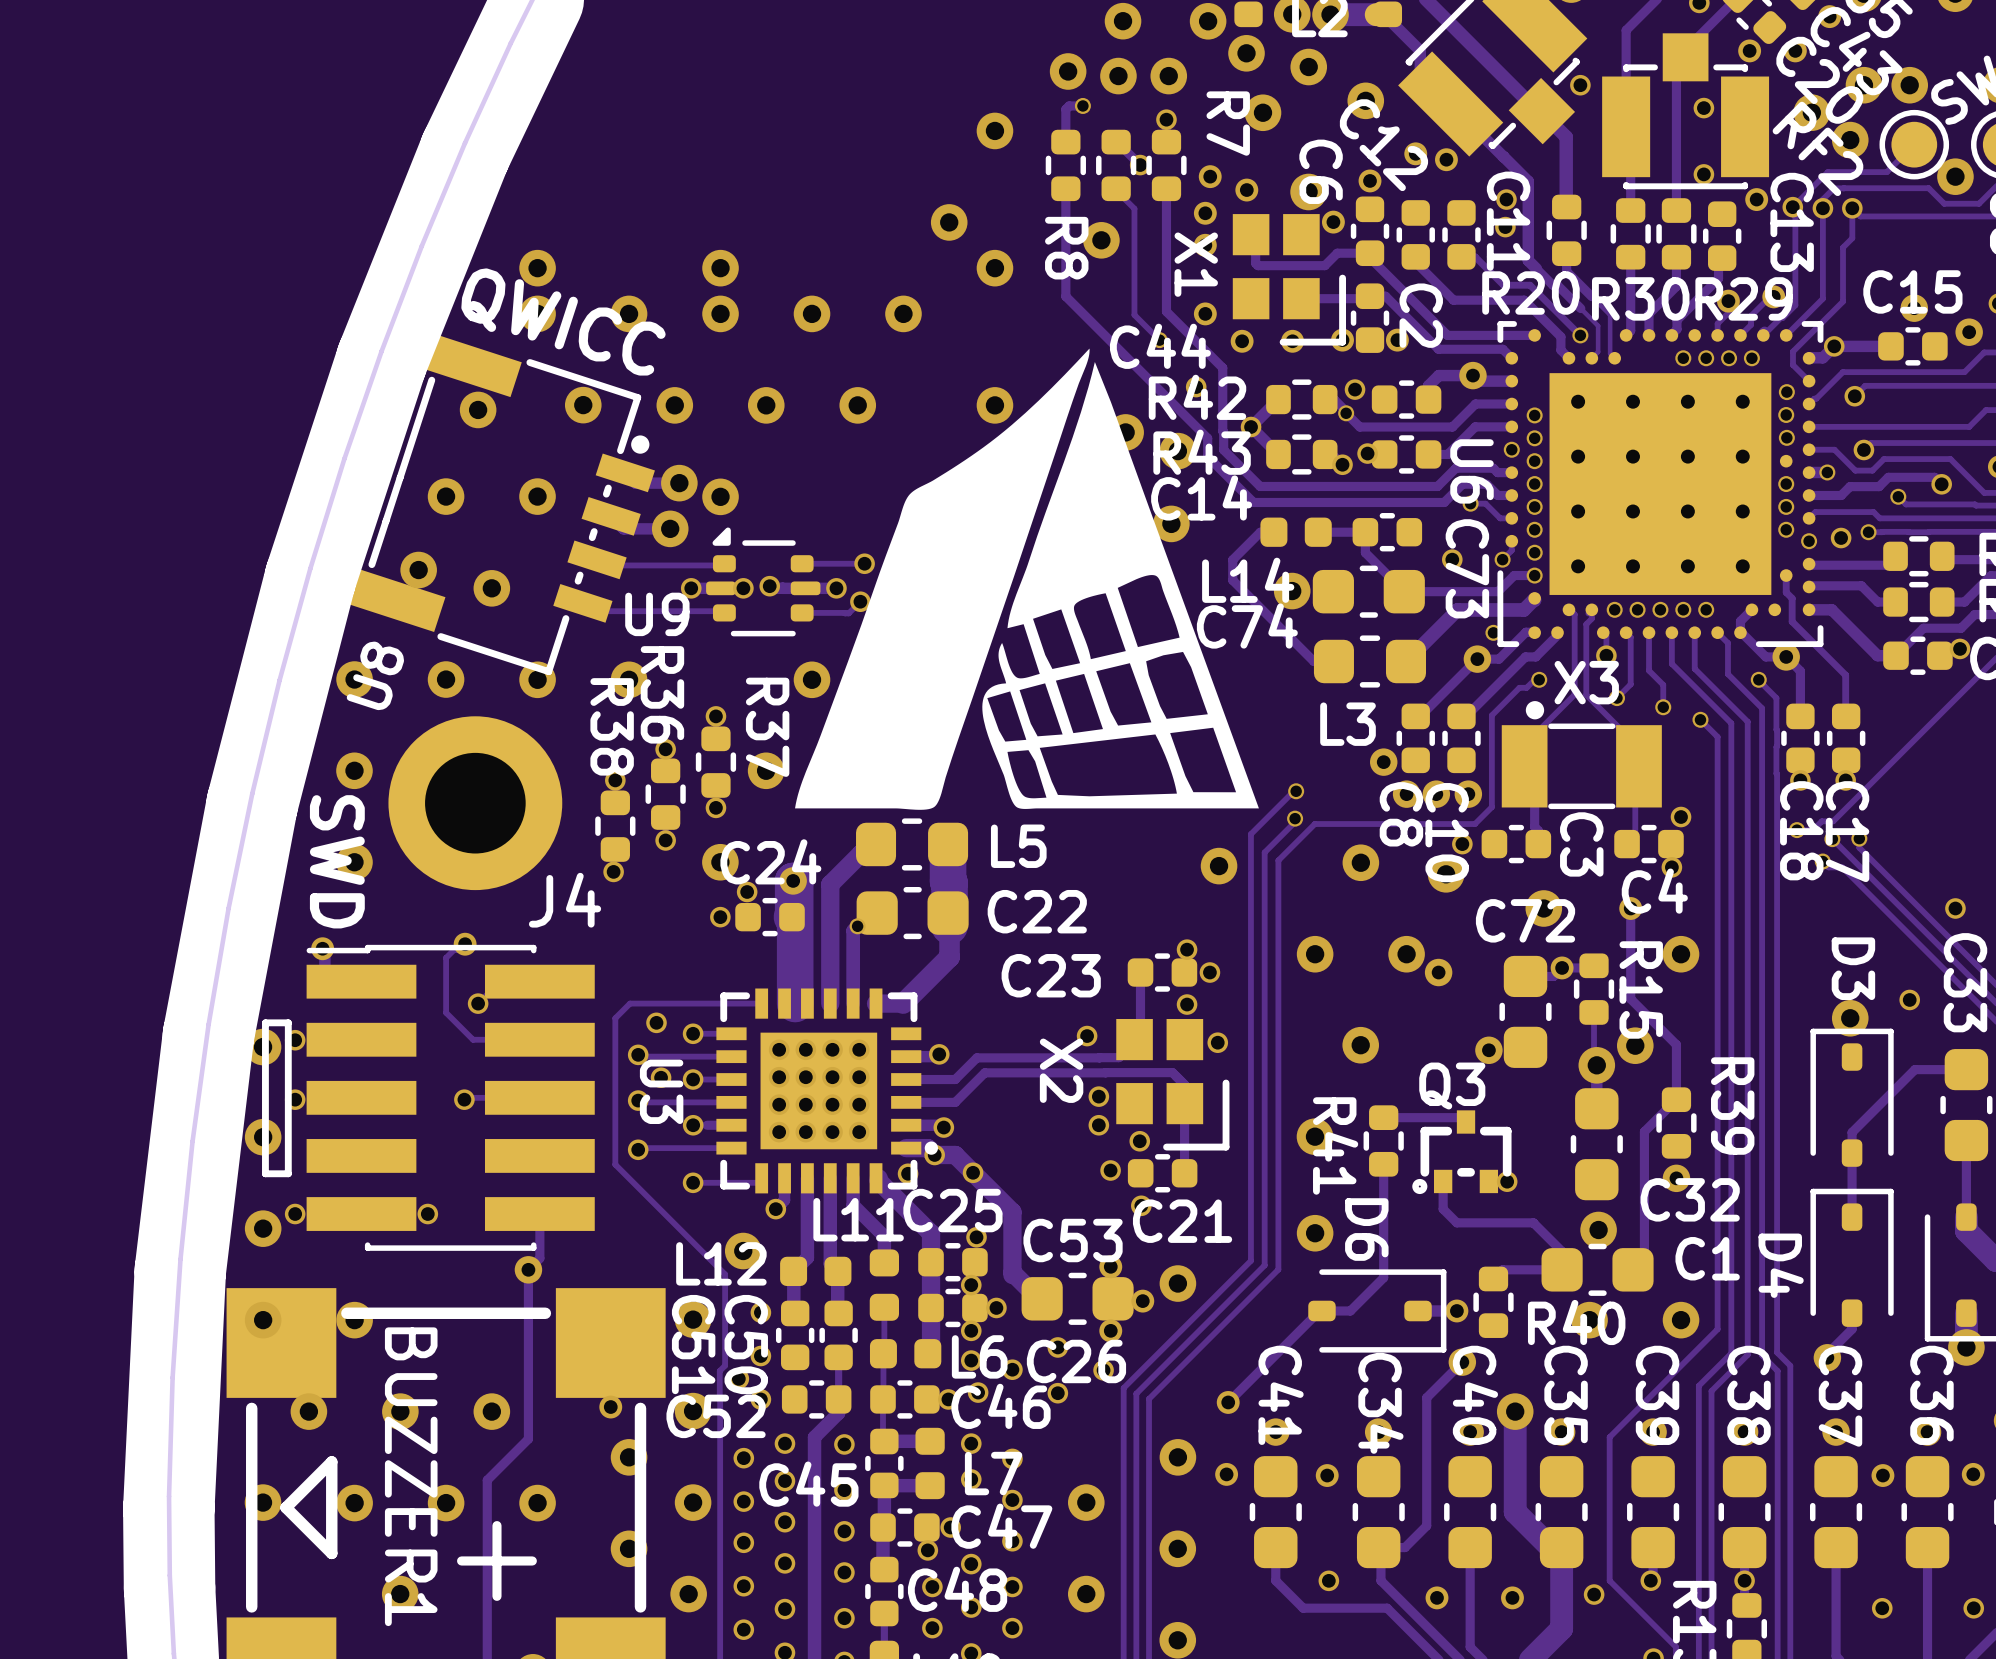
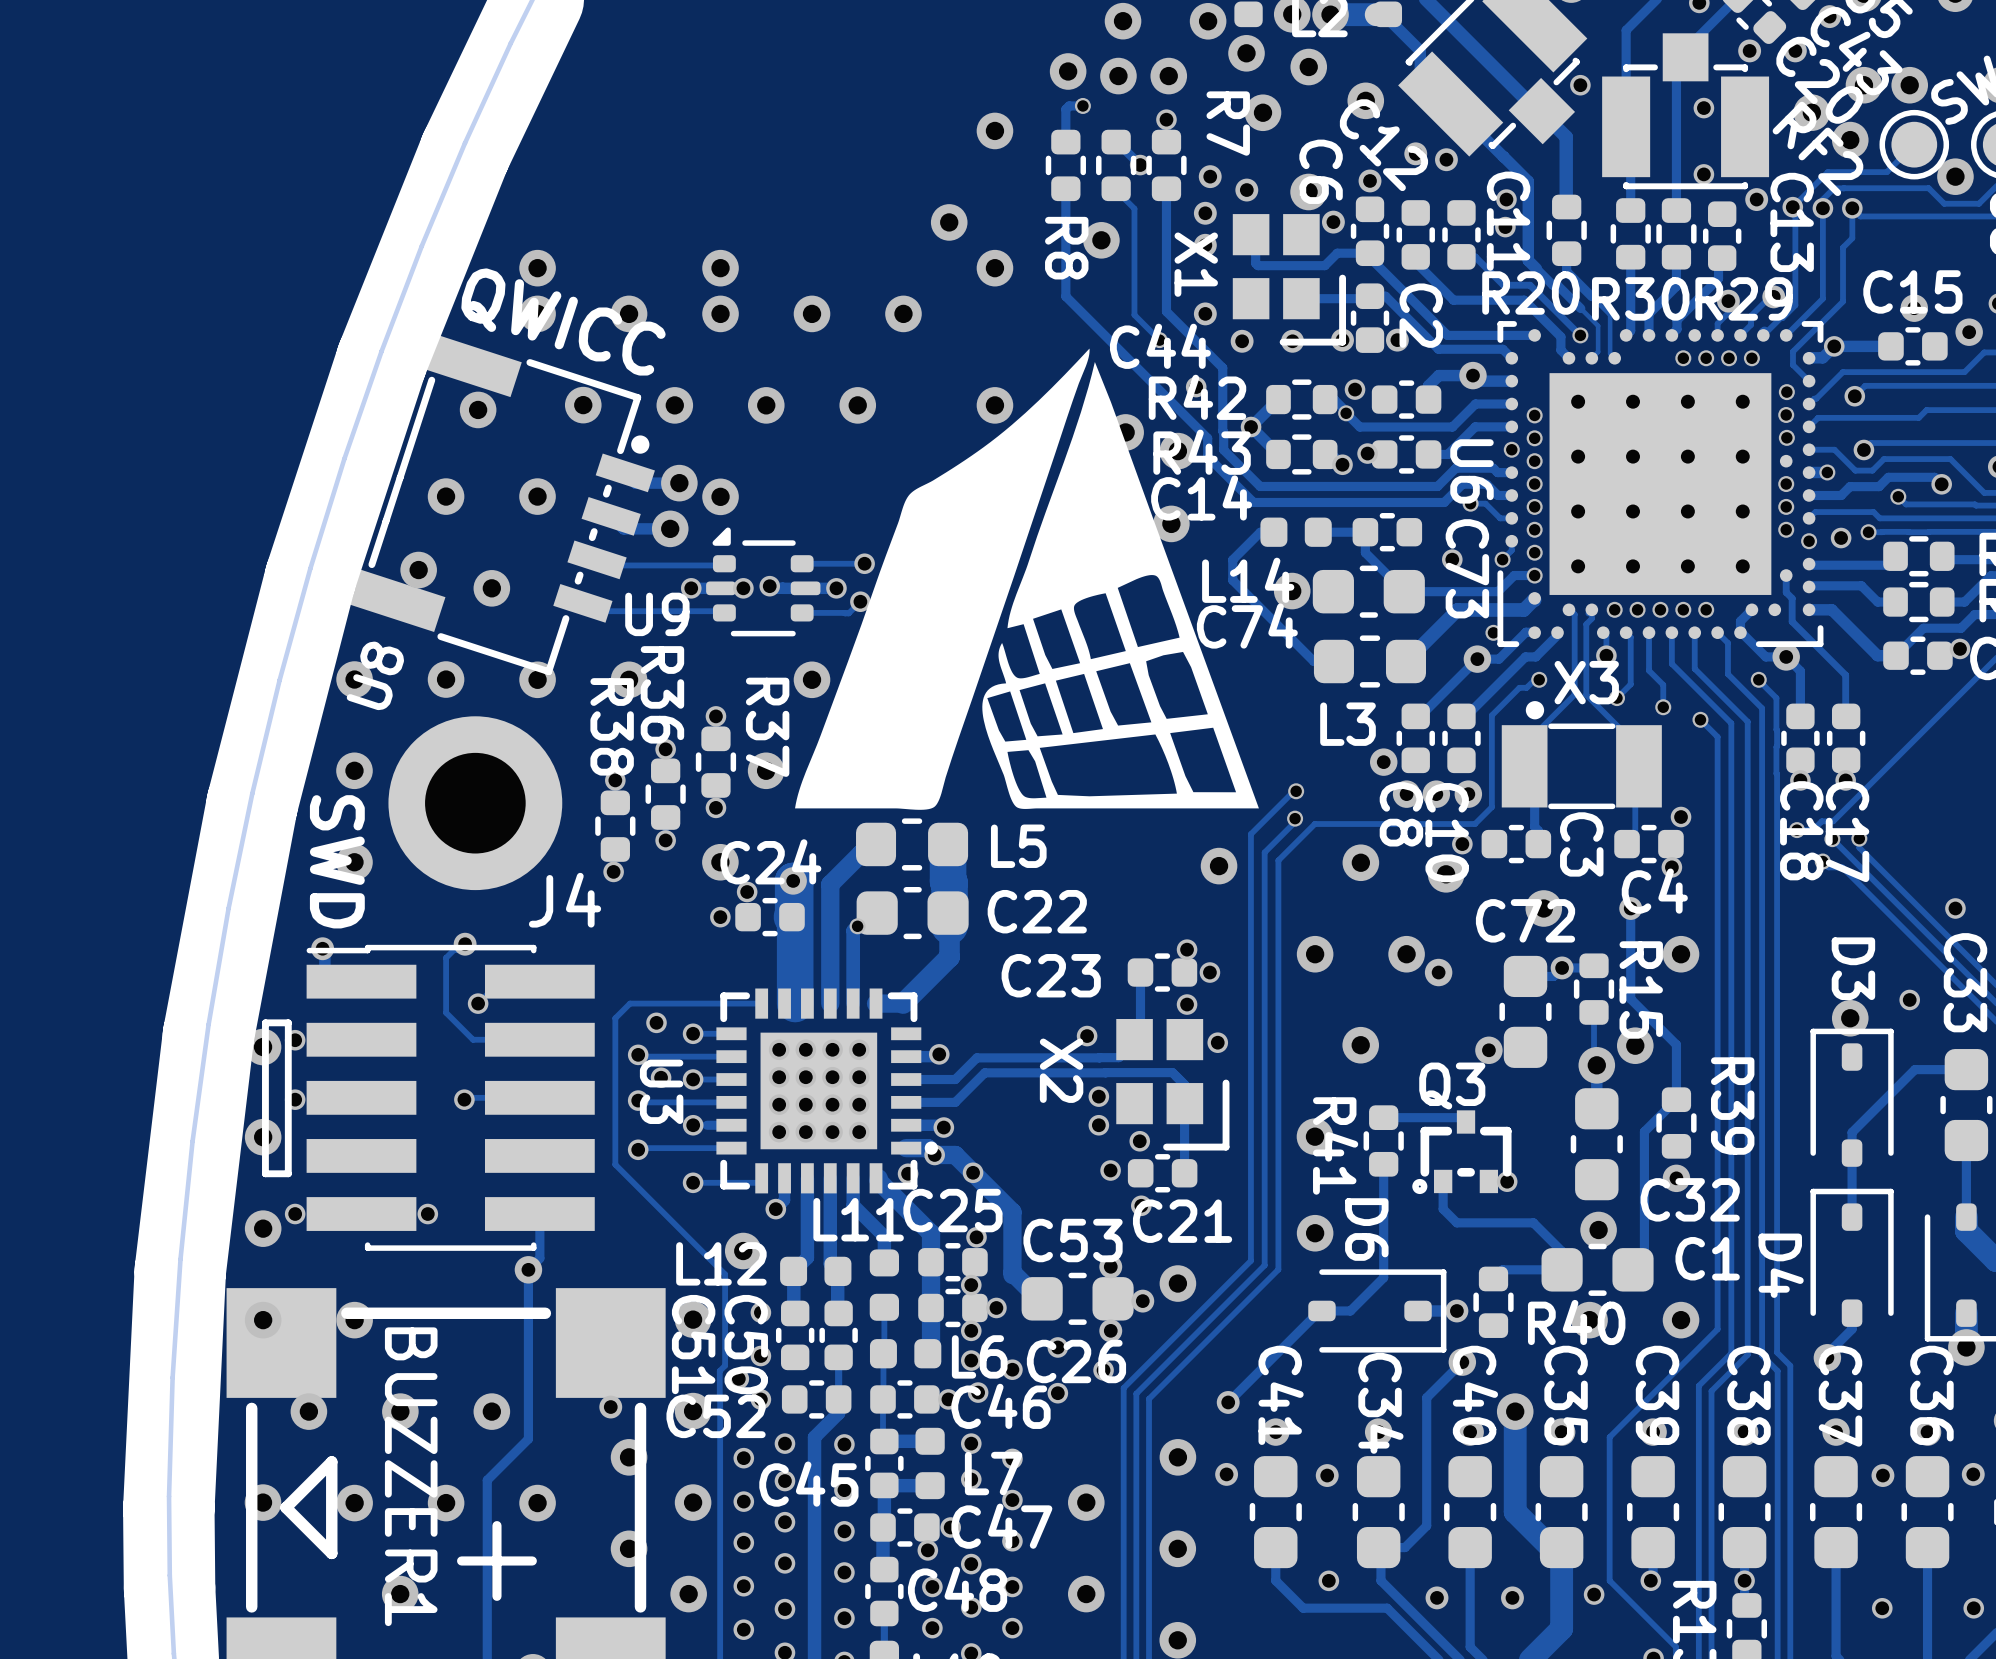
track: (1986, 410) (1969, 426) (1809, 426) -> (1986, 410) (1926, 410) (1918, 417) (1818, 417) (1809, 426)

